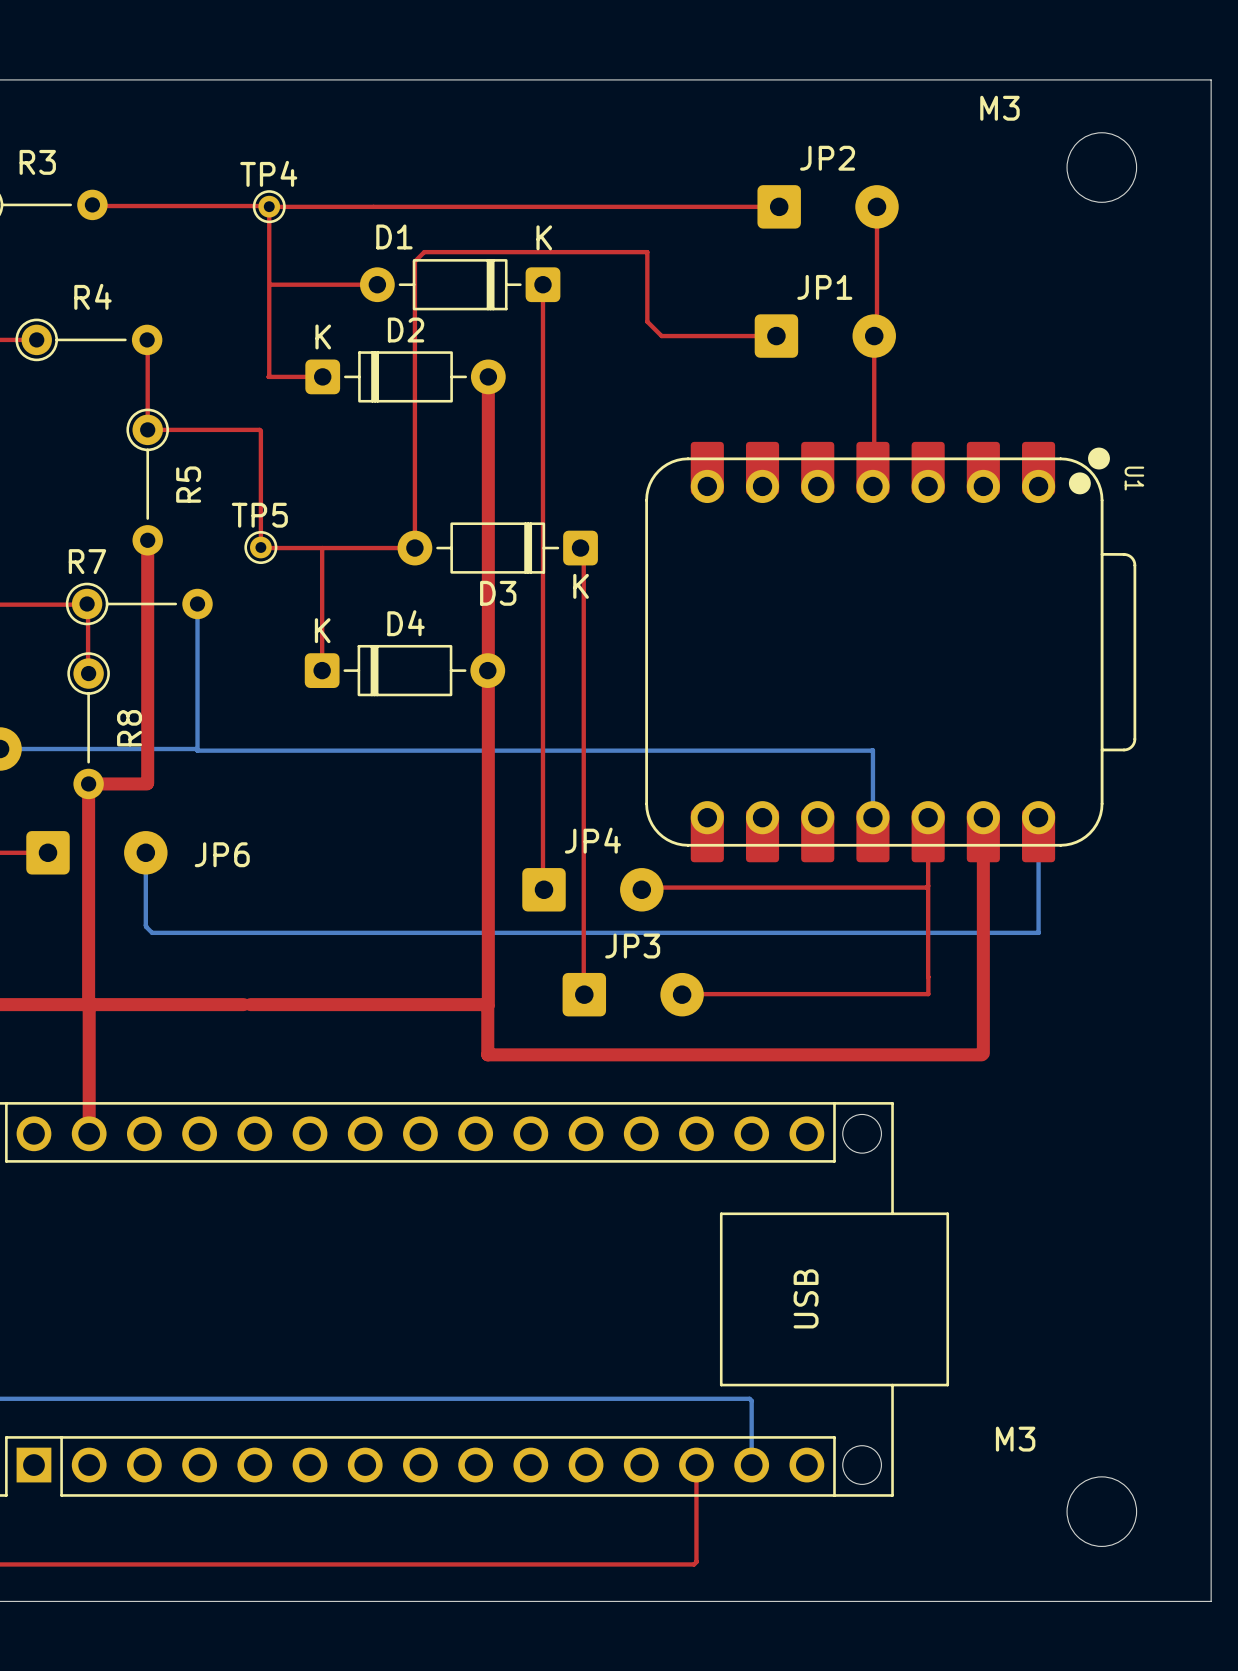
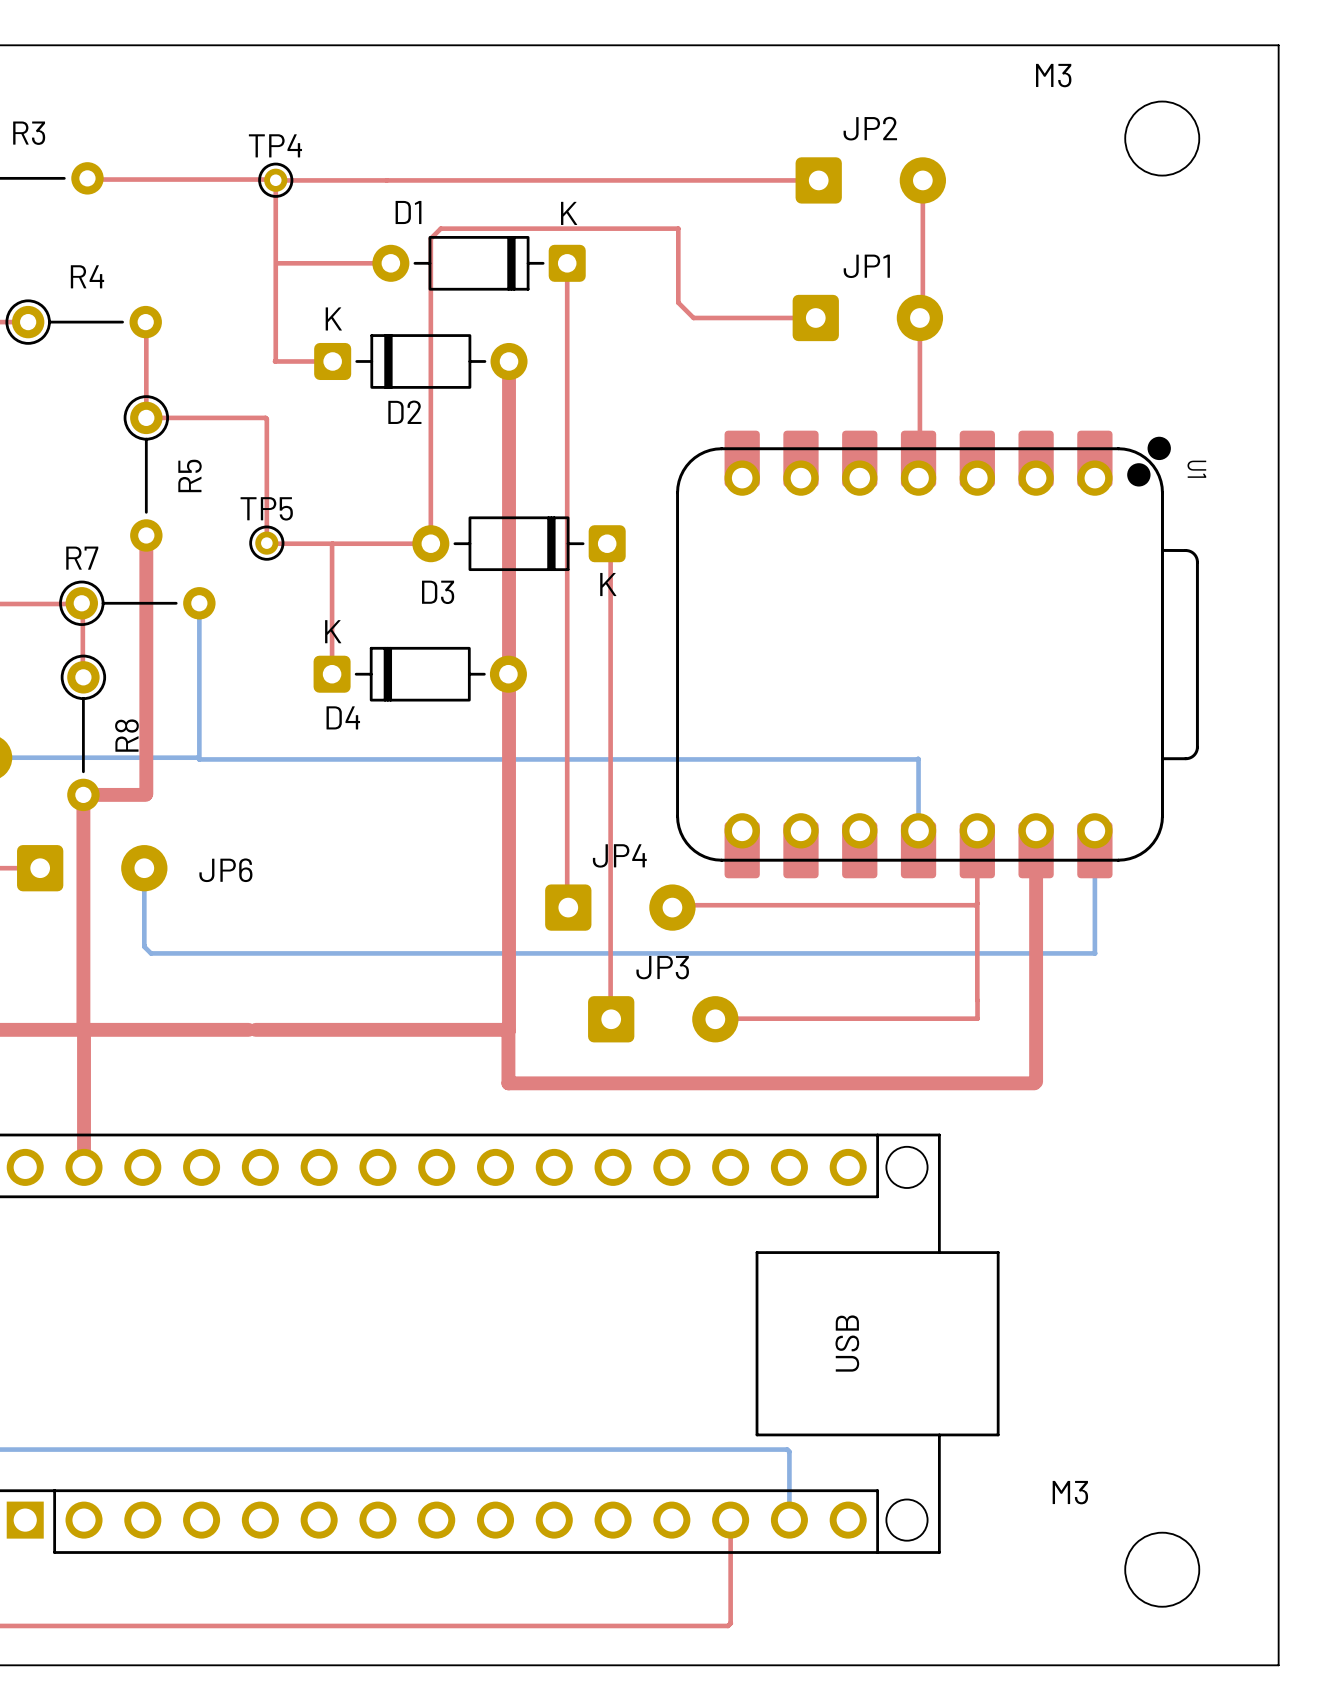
D2 name position: D2 (406, 330) -> D2 (404, 412)
D3 name position: D3 (498, 593) -> D3 (438, 592)
D4 name position: D4 (406, 623) -> D4 (343, 717)

